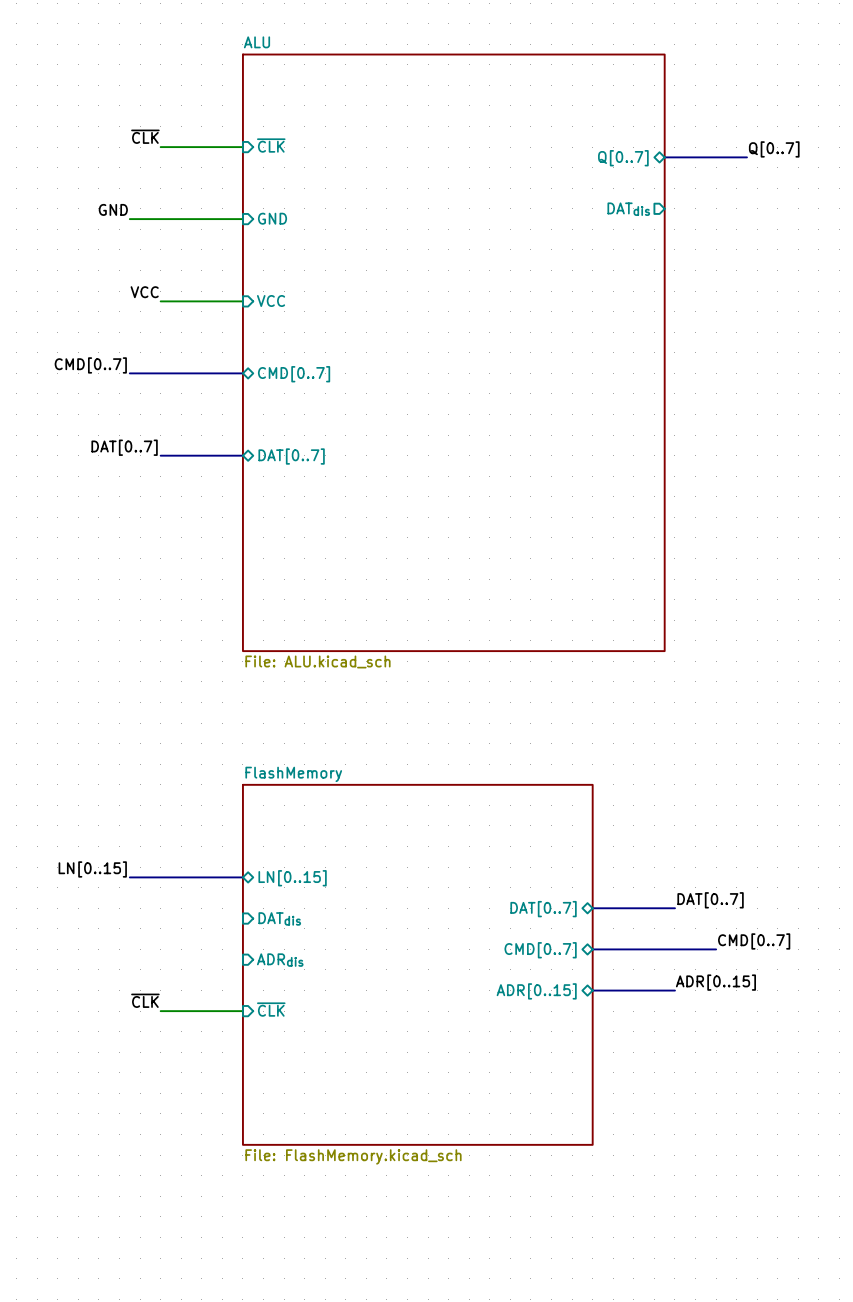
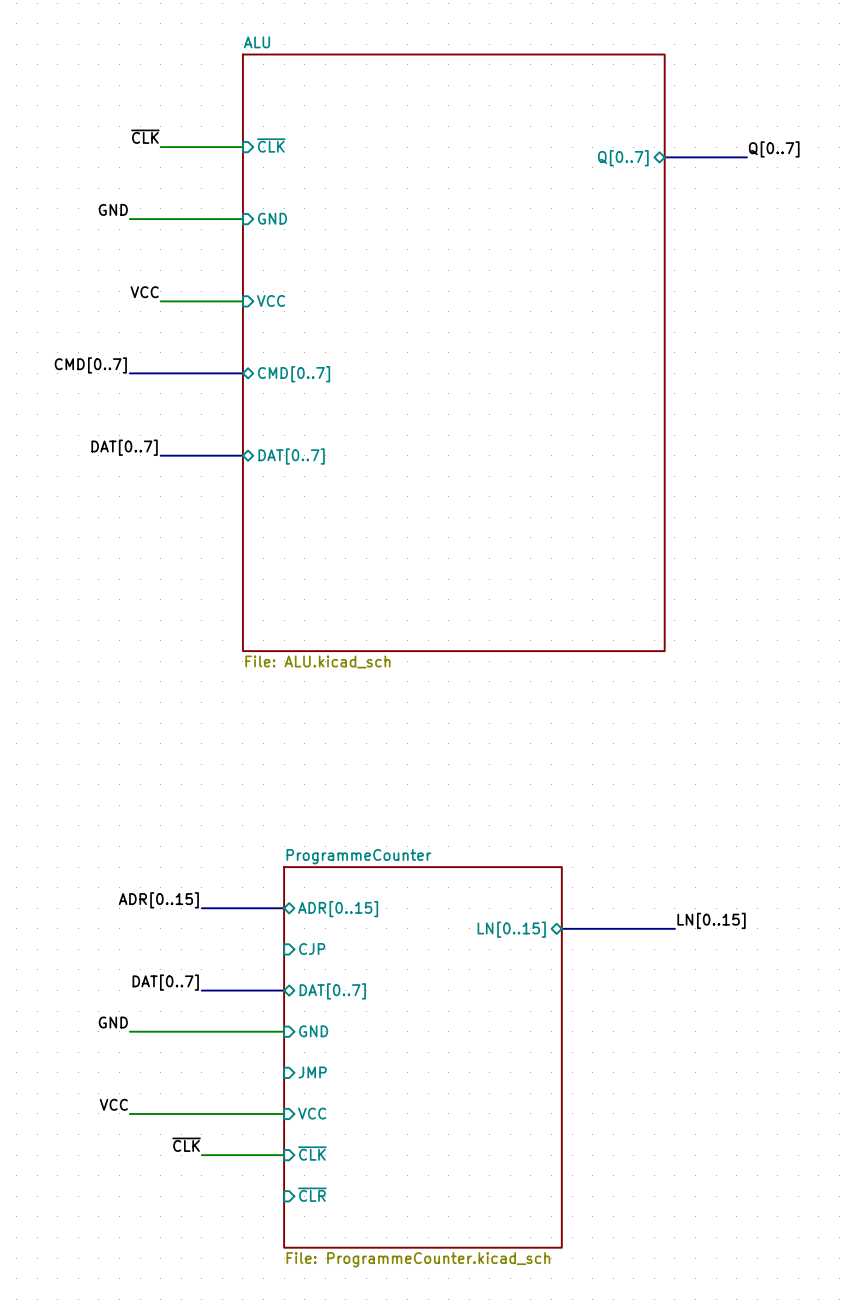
sheet pin: DATdis (628, 209) -> none
label: LN[0..15] (92, 869) -> none
bus: (129, 877) (242, 877) -> none
sheet pin: LN[0..15] (292, 878) -> none
label: none -> ADR[0..15] (158, 900)
label: DAT[0..7] (710, 900) -> none
bus: none -> (201, 908) (284, 908)
bus: (592, 908) (674, 908) -> none
sheet pin: none -> ADR[0..15] (338, 909)
sheet pin: DAT[0..7] (543, 909) -> none
sheet pin: DATdis (279, 918) -> none
label: none -> LN[0..15] (711, 920)
bus: none -> (561, 928) (674, 928)
sheet pin: none -> LN[0..15] (511, 929)
label: CMD[0..7] (754, 941) -> none
sheet pin: none -> CJP (312, 949)
bus: (592, 949) (716, 949) -> none
sheet pin: CMD[0..7] (540, 950) -> none
sheet pin: ADRdis (280, 960) -> none
sheet FlashMemory: File: FlashMemory.kicad_sch (417, 964) -> none
label: none -> DAT[0..7] (165, 982)
label: ADR[0..15] (715, 982) -> none
bus: none -> (201, 990) (284, 990)
bus: (592, 990) (674, 990) -> none
sheet pin: none -> DAT[0..7] (332, 991)
sheet pin: ADR[0..15] (536, 991) -> none
label position: ~{CLK} (145, 1000) -> ~{CLK} (186, 1144)
sheet pin position: ~{CLK} (271, 1009) -> ~{CLK} (312, 1153)
wire: (160, 1011) (242, 1011) -> (201, 1155) (284, 1155)
label: none -> GND (113, 1022)
wire: none -> (129, 1031) (284, 1031)
sheet pin: none -> GND (313, 1031)
sheet ProgrammeCounter: none -> File: ProgrammeCounter.kicad_sch (422, 1057)
sheet pin: none -> JMP (312, 1072)
label: none -> VCC (113, 1104)
wire: none -> (129, 1113) (284, 1113)
sheet pin: none -> VCC (312, 1113)
sheet pin: none -> ~{CLR} (312, 1194)

